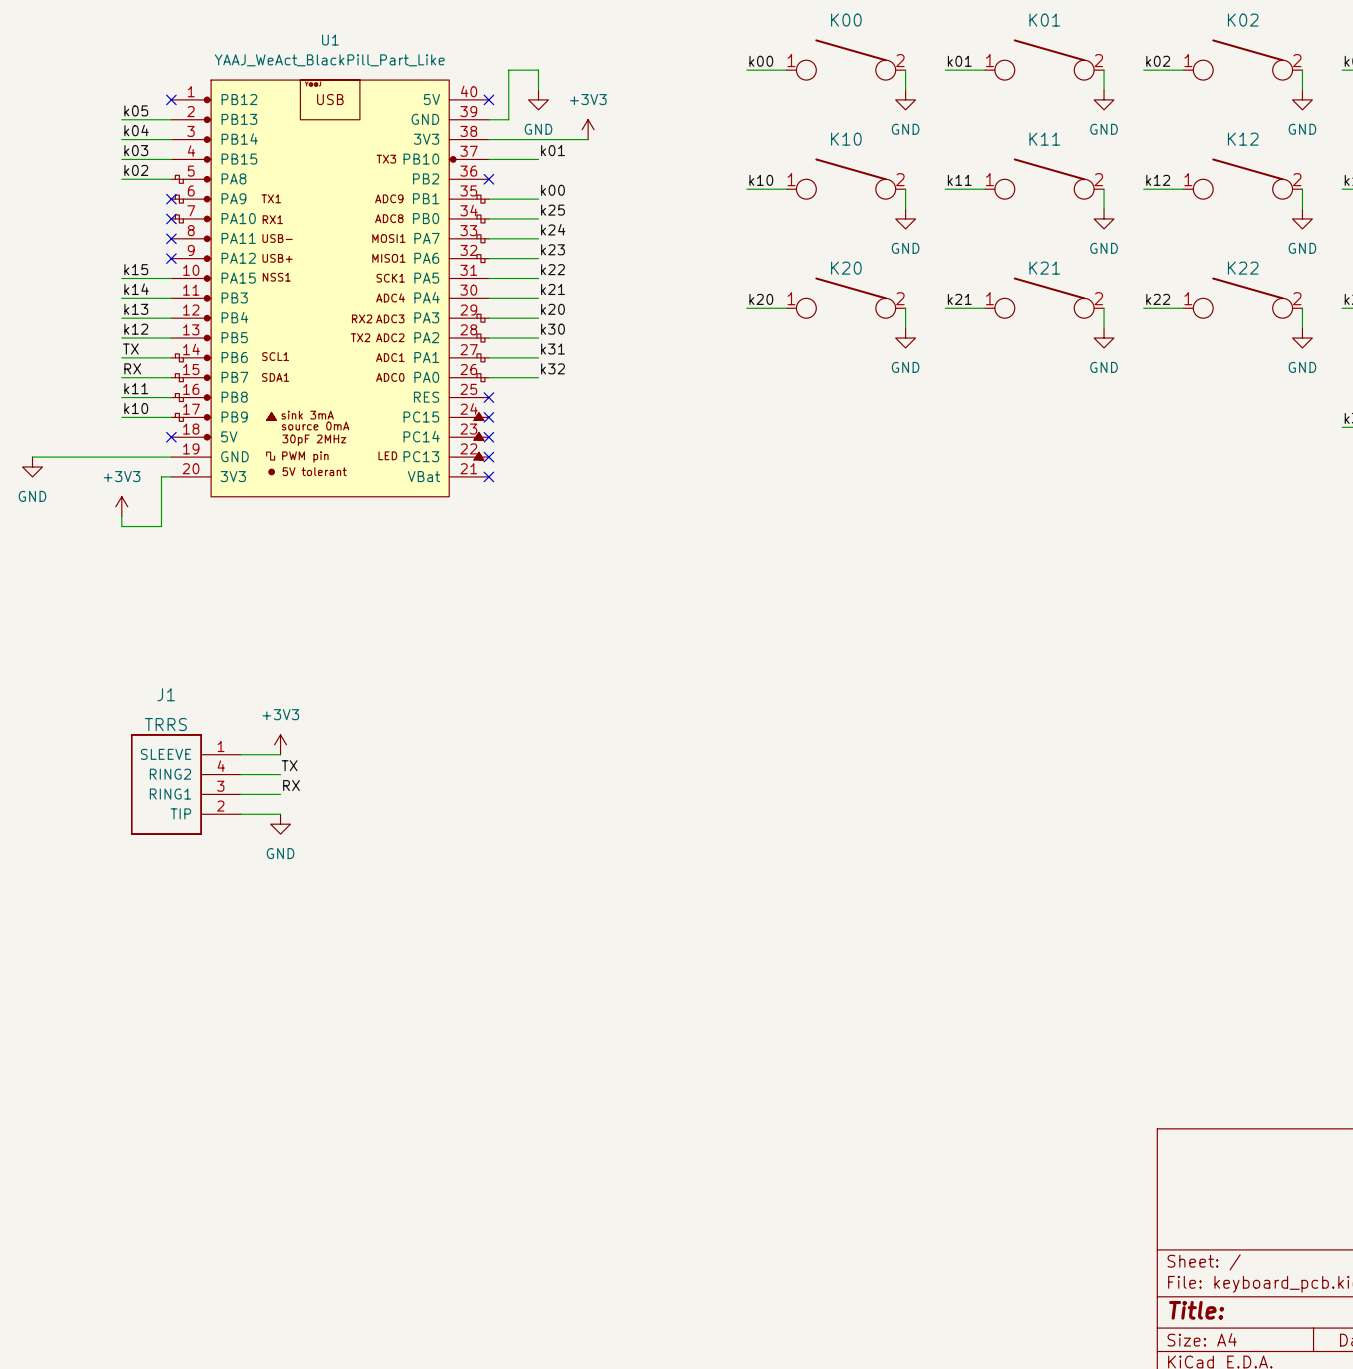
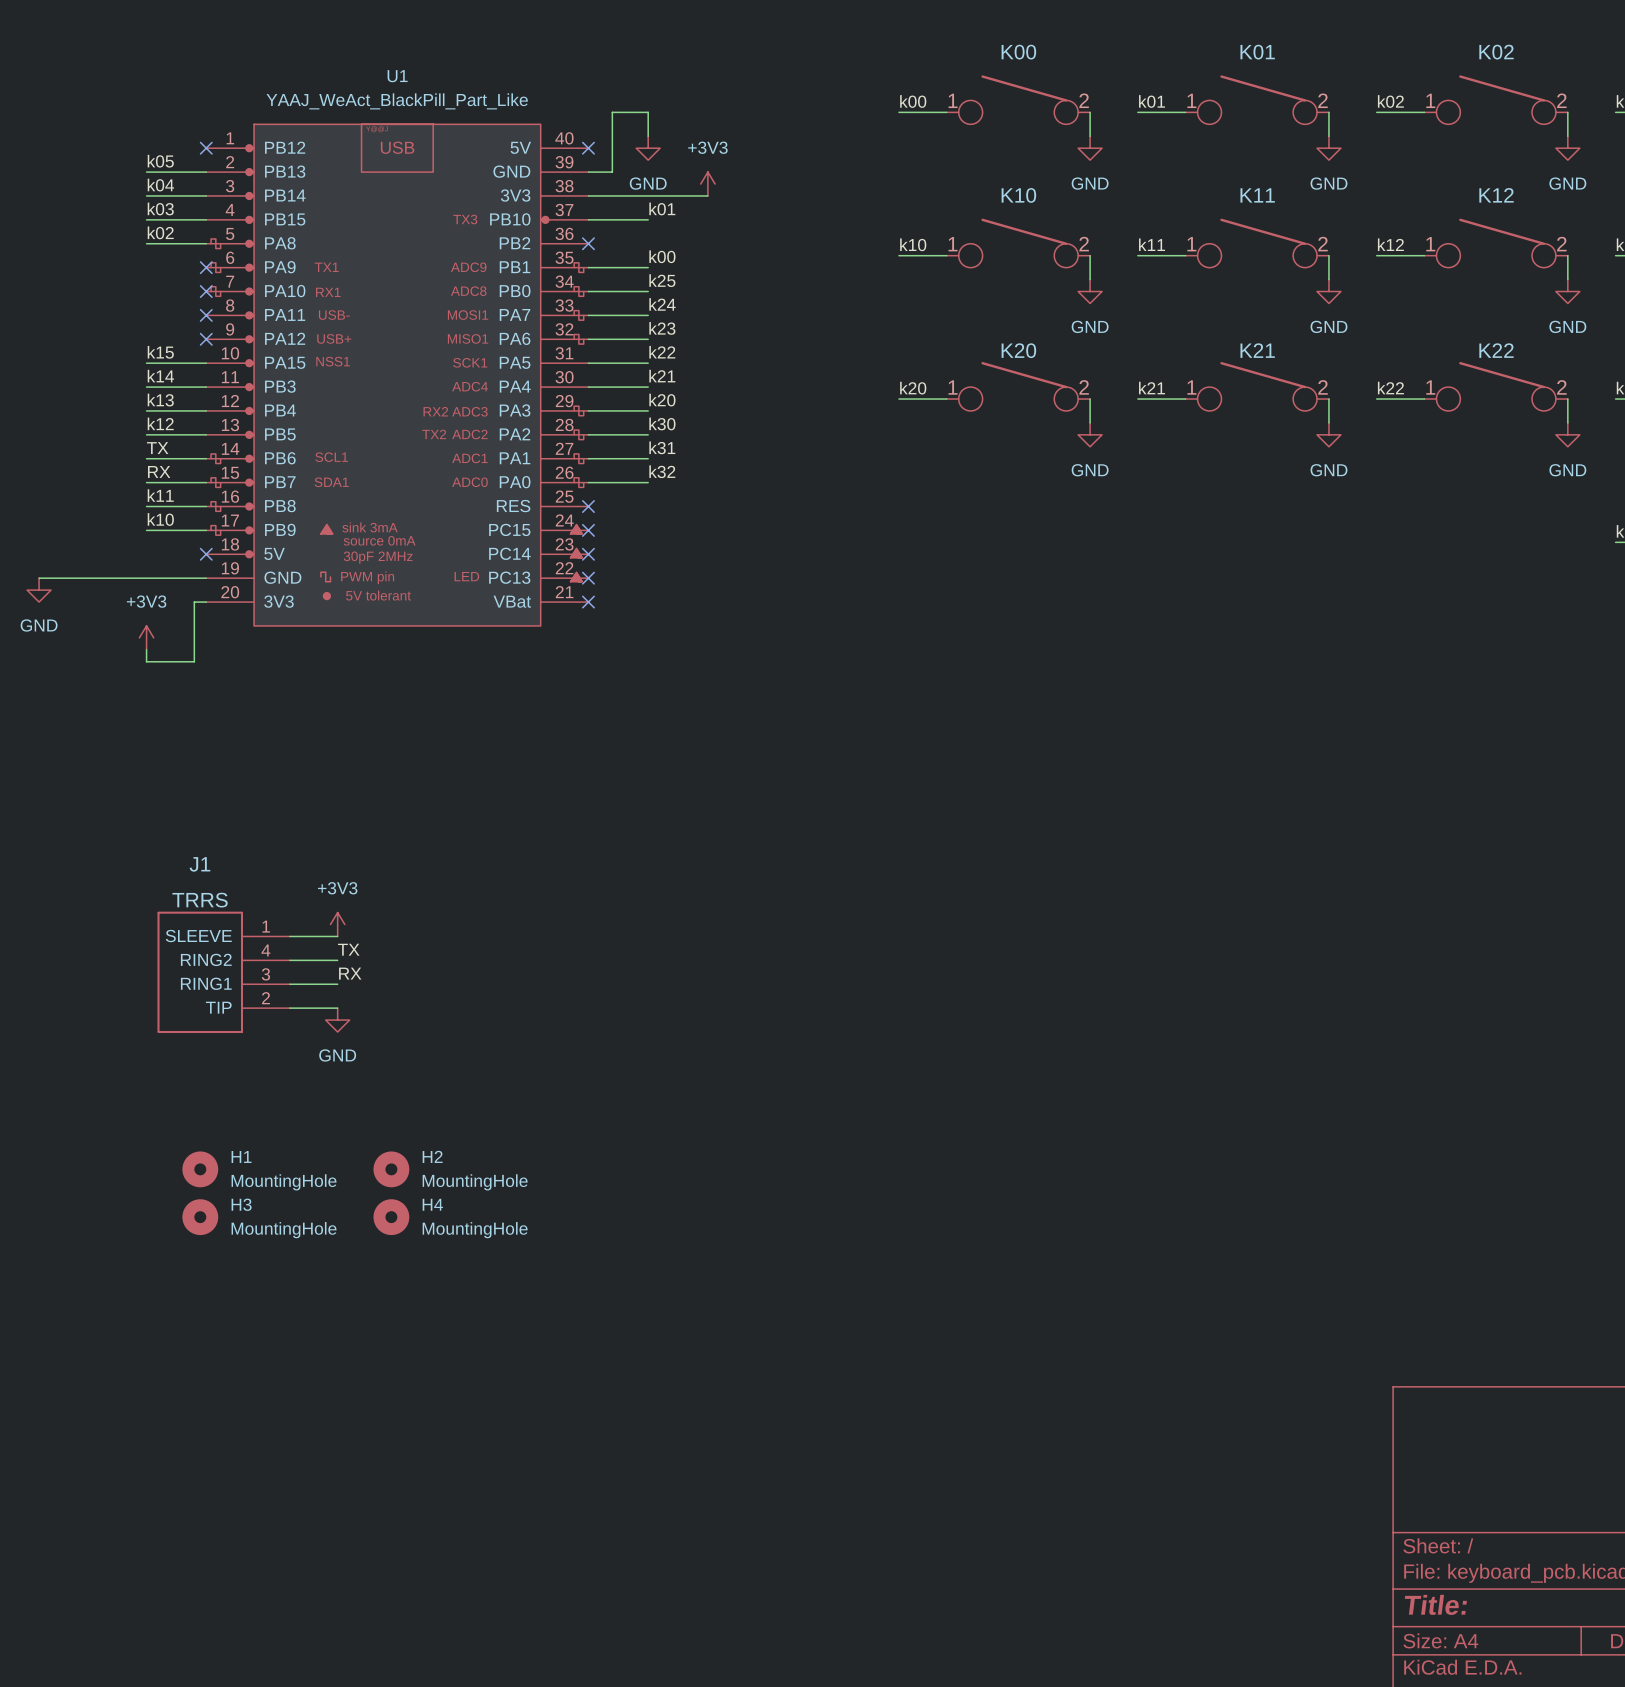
H1: none -> MountingHole (200, 1169)
H2: none -> MountingHole (391, 1169)
H3: none -> MountingHole (200, 1217)
H4: none -> MountingHole (391, 1217)

